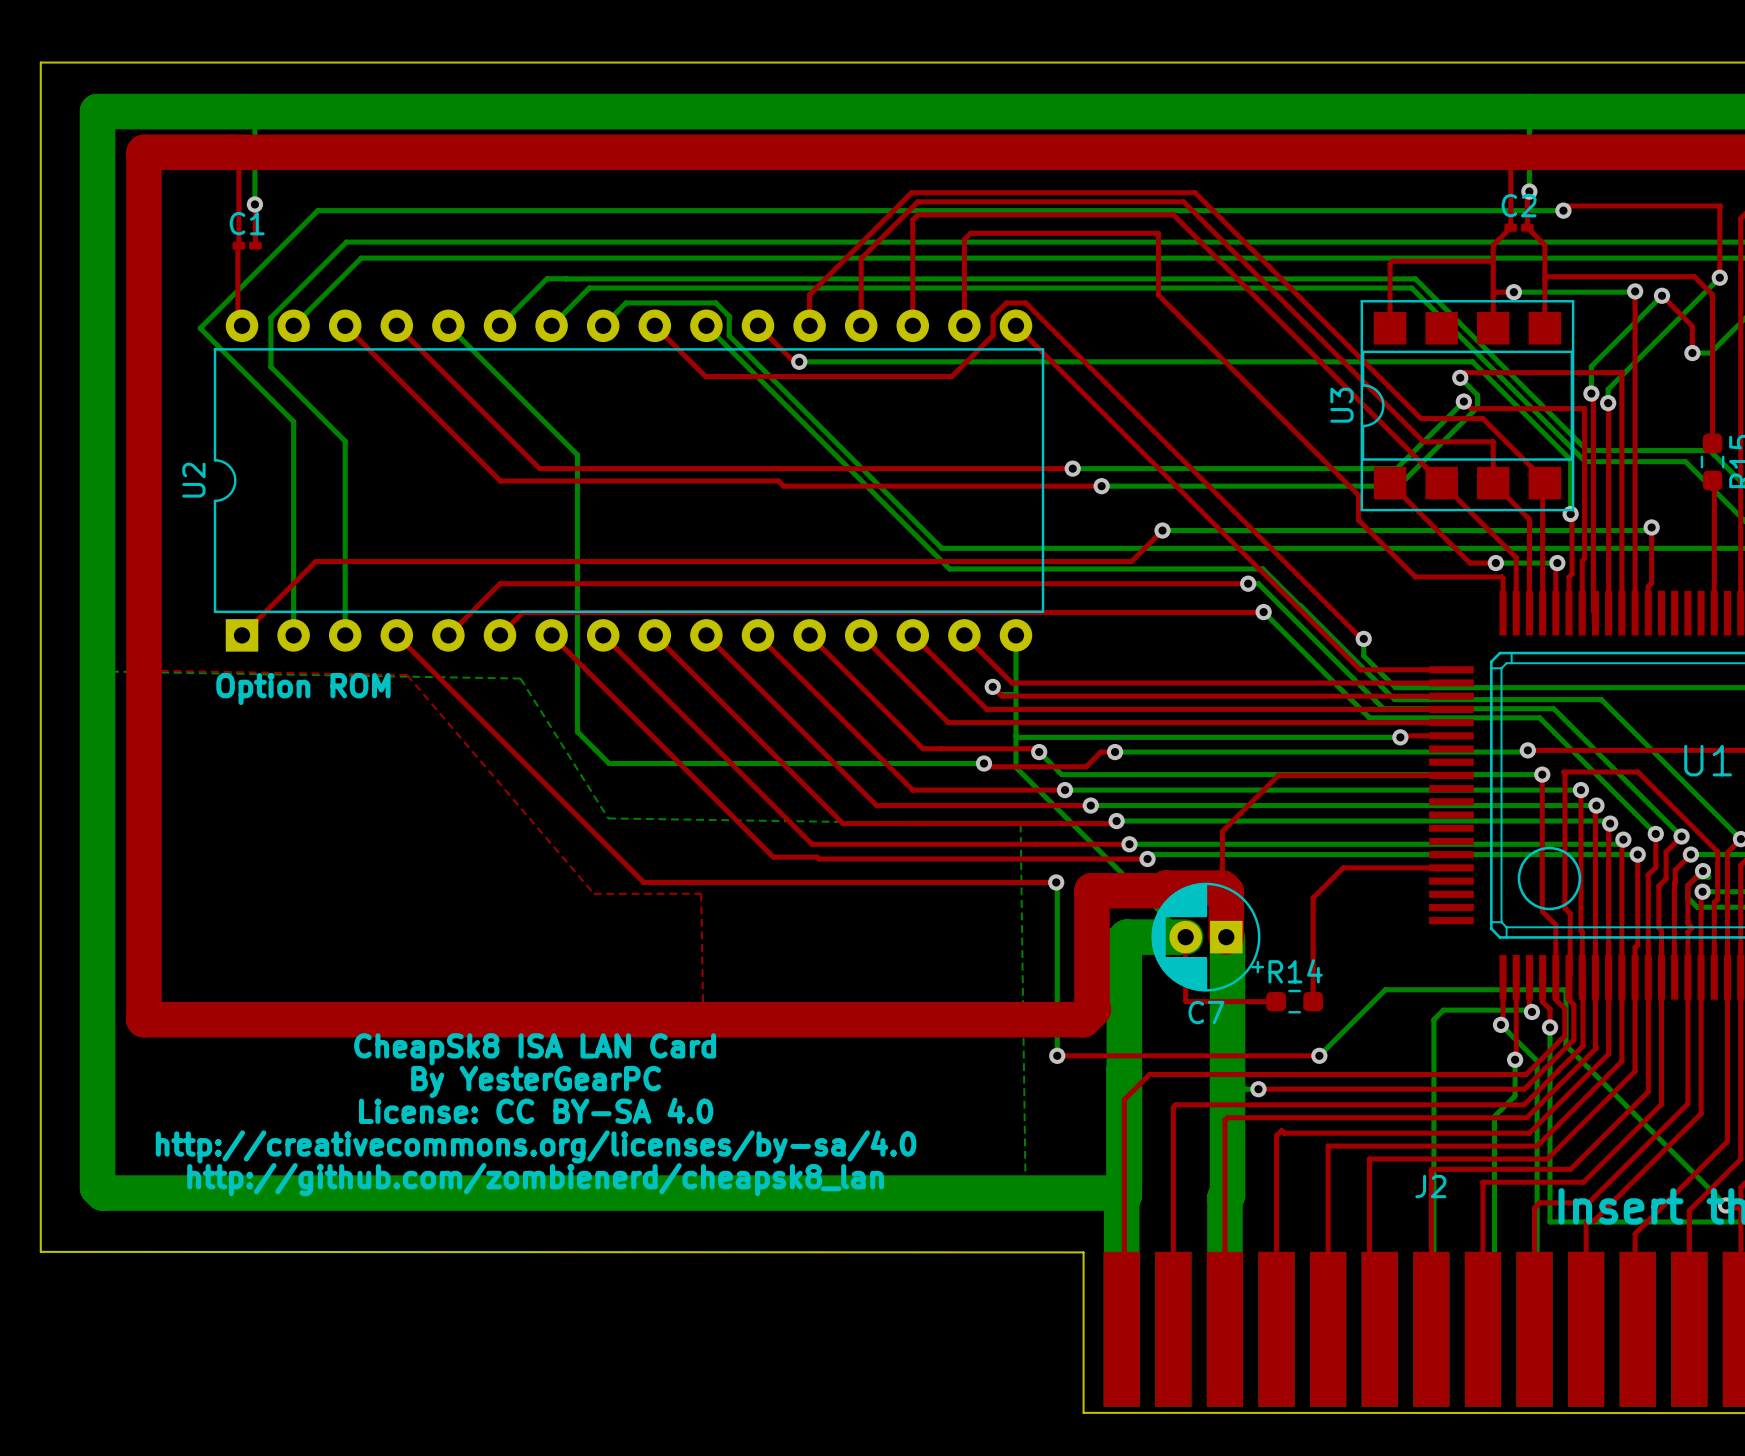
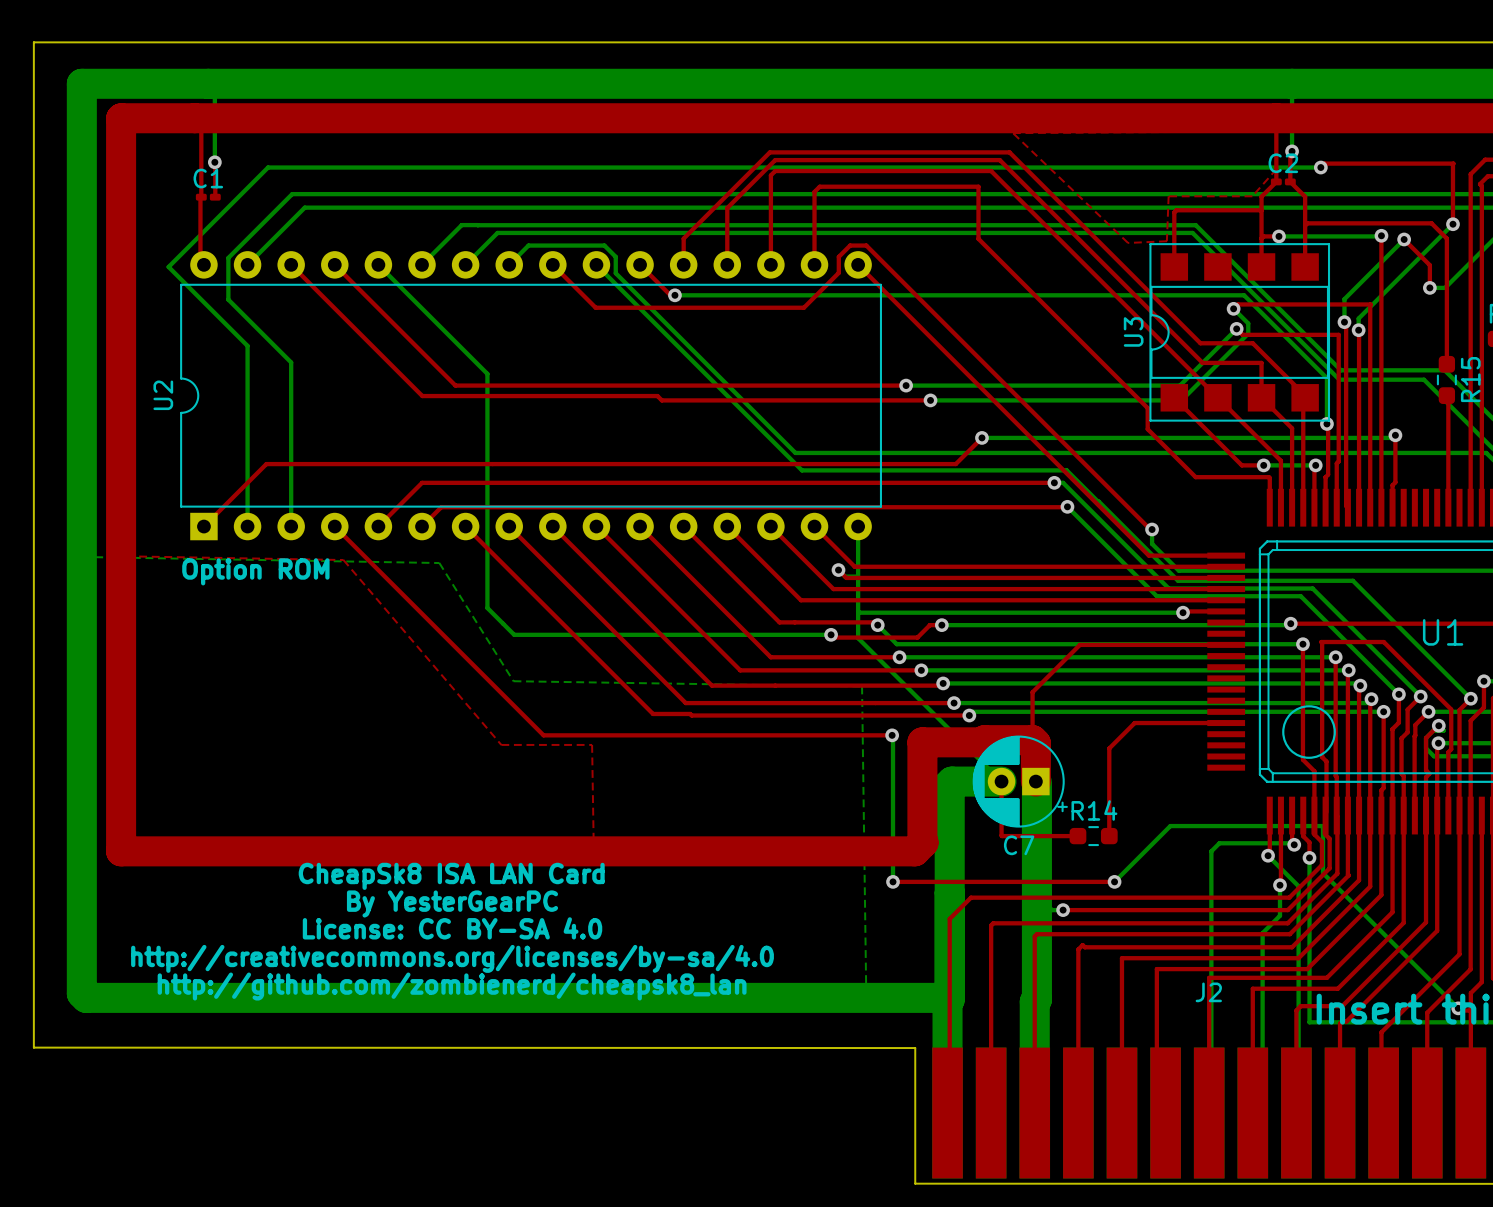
top zone outline: none -> (1276, 131) (1012, 133) (1128, 242) (1166, 241) (1168, 196) (1252, 196) (1276, 168) (1276, 131)

